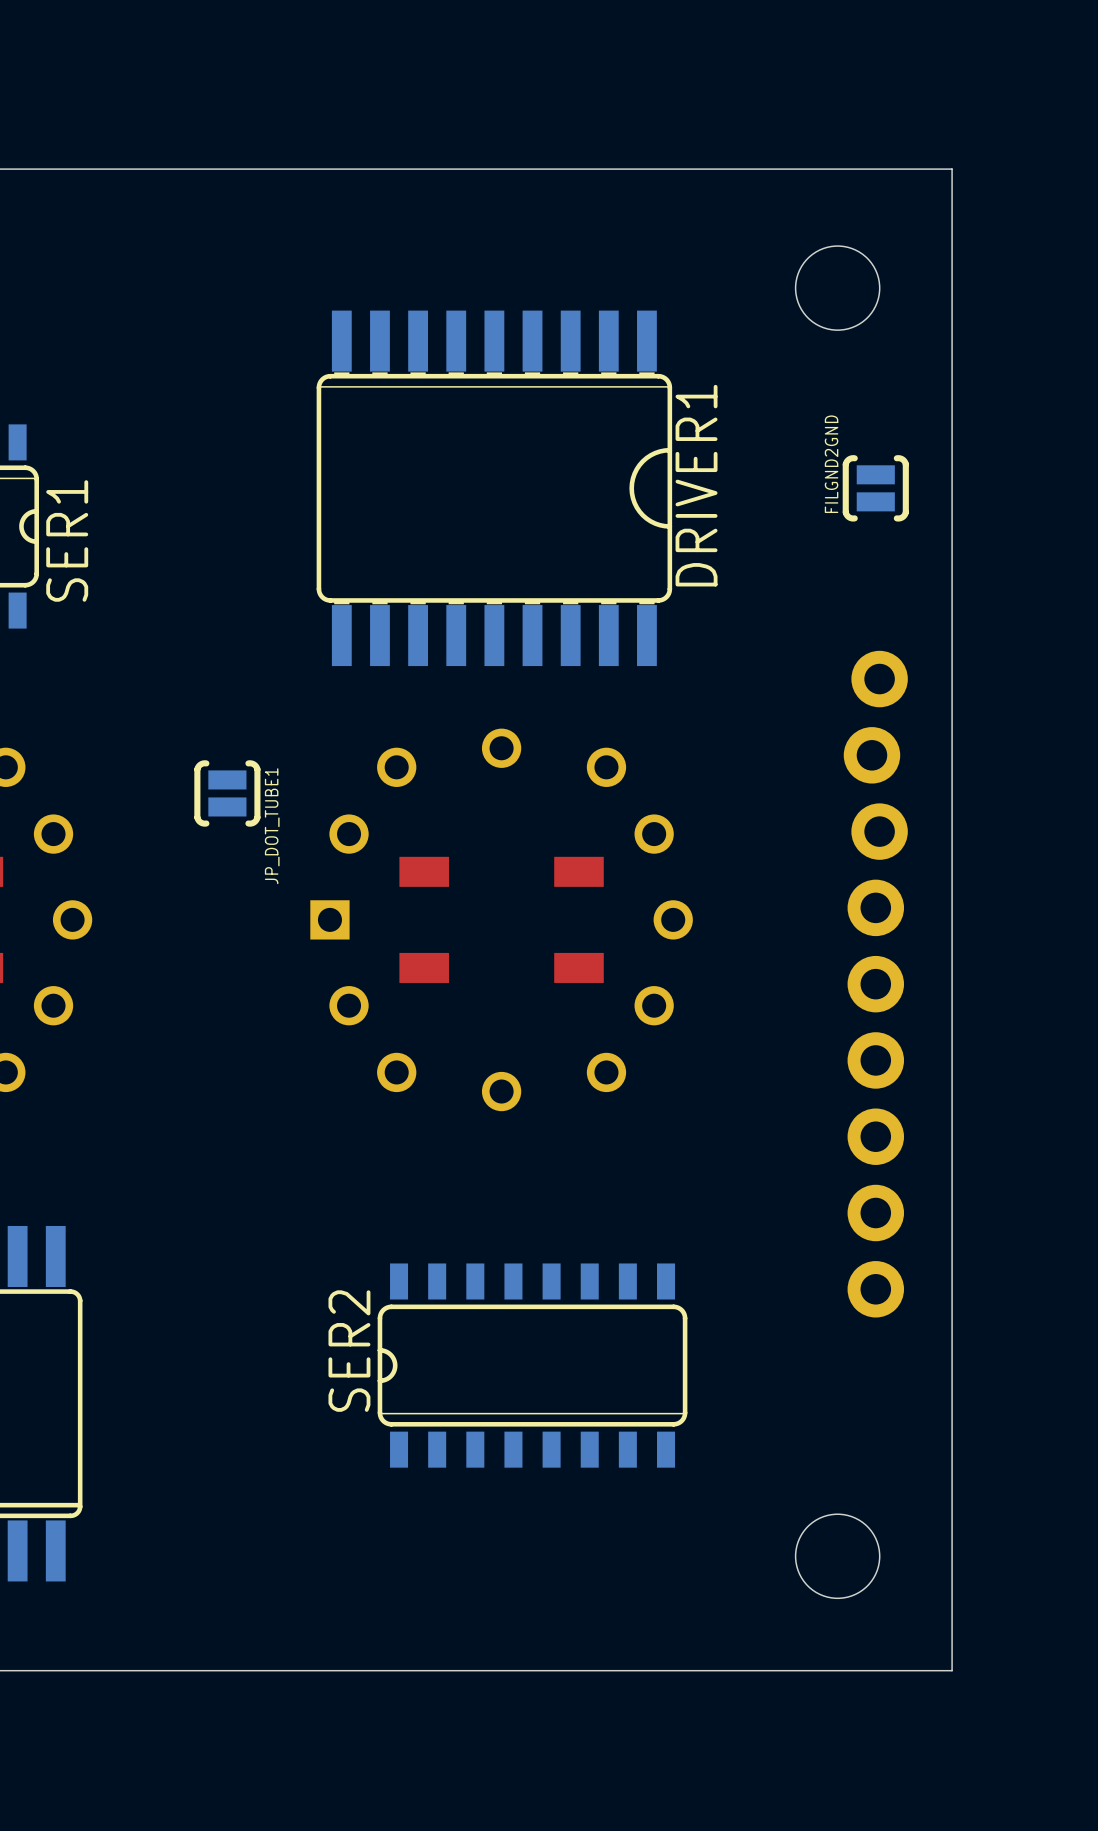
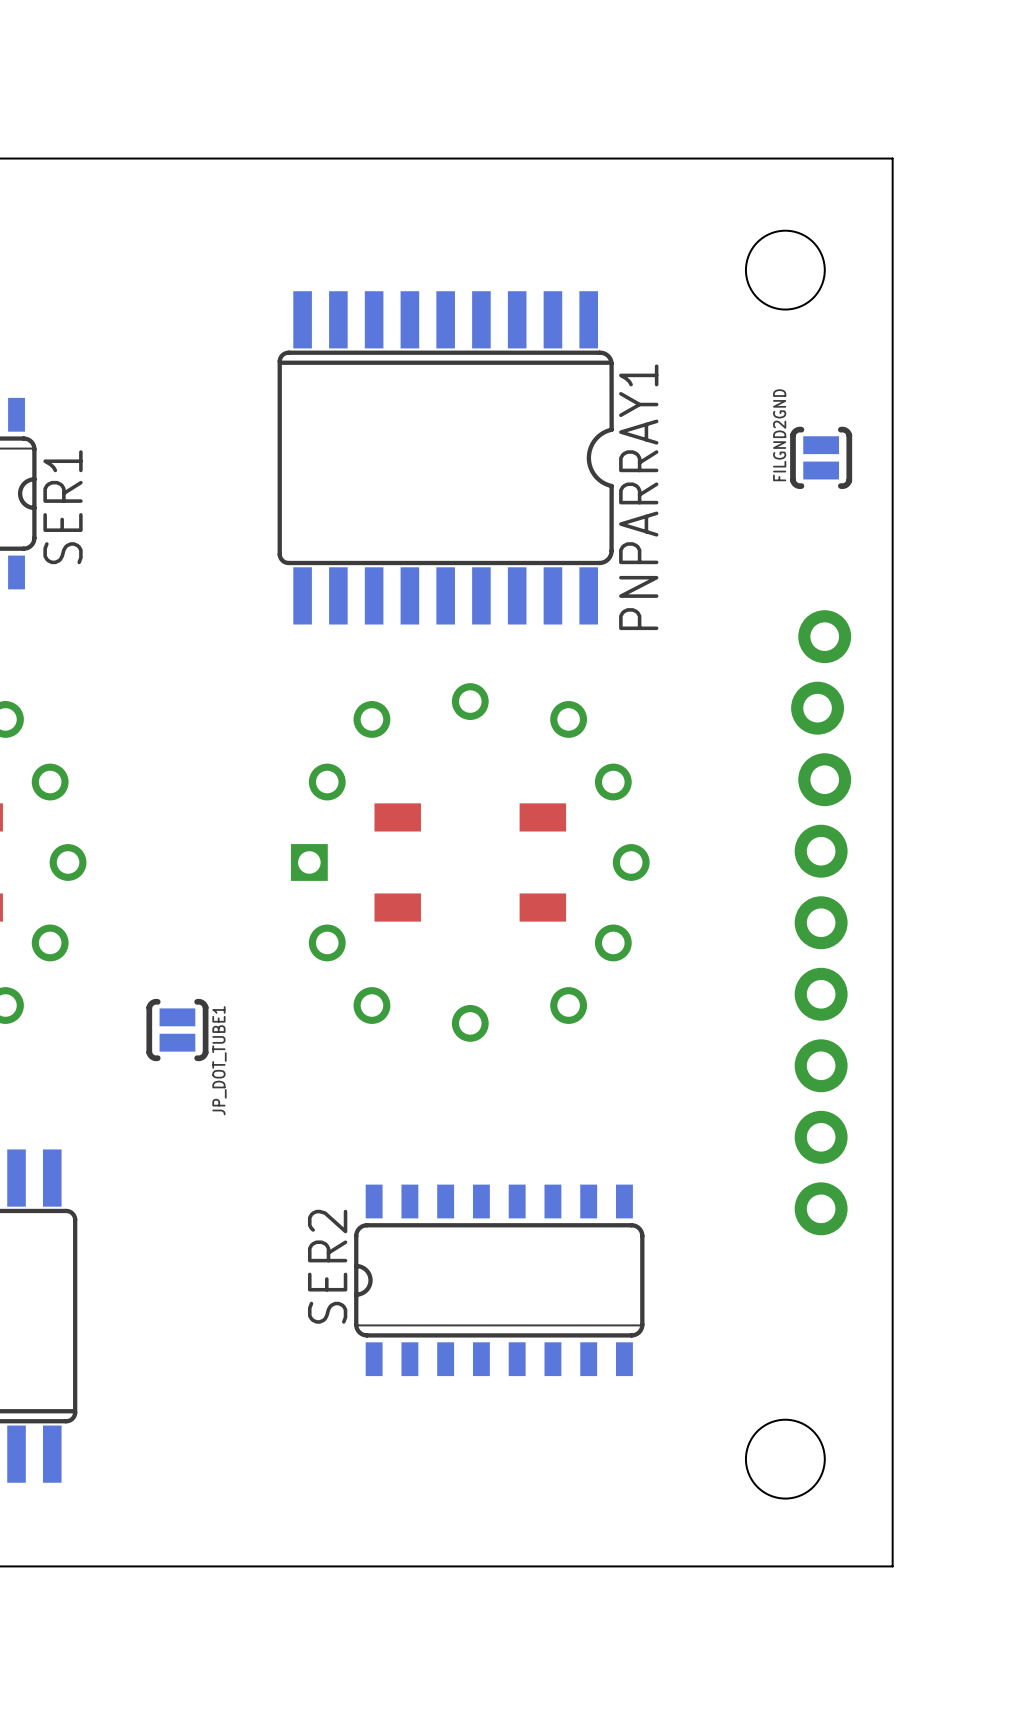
PNPARRAY1: none -> (445, 457)
DRIVER1: (494, 488) -> none
JP_DOT_TUBE1 position: (227, 793) -> (177, 1030)

